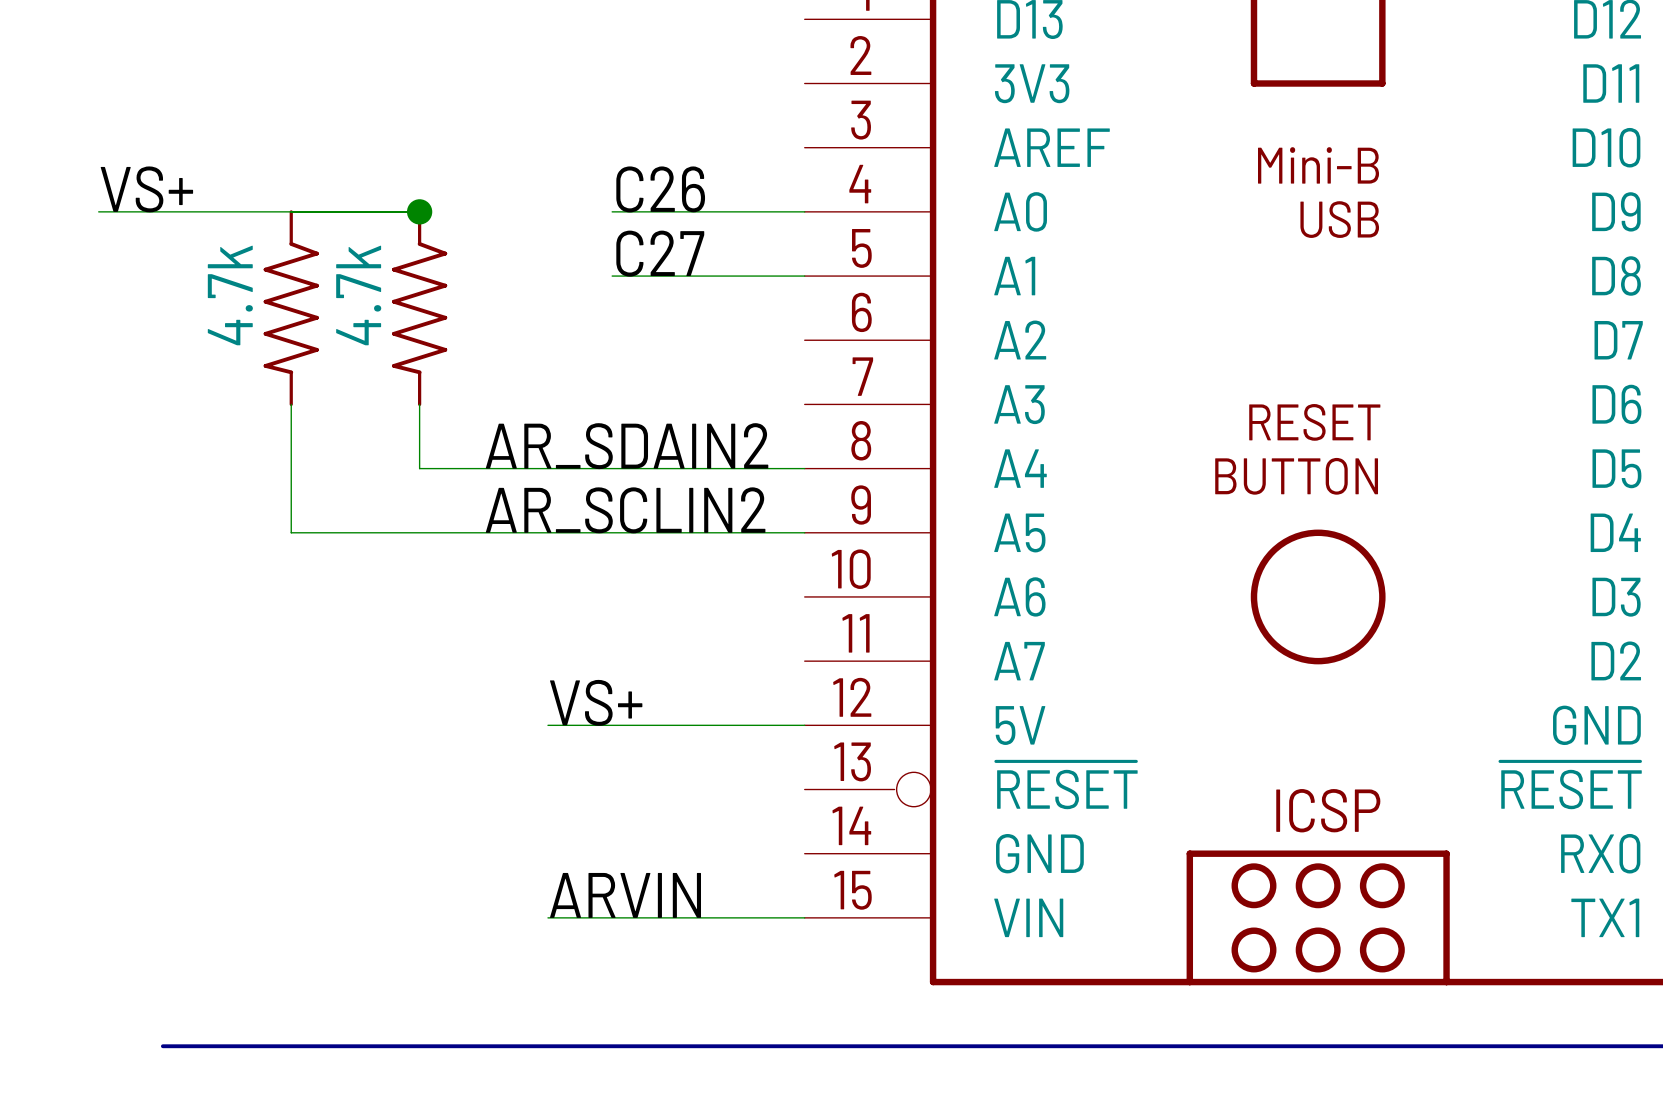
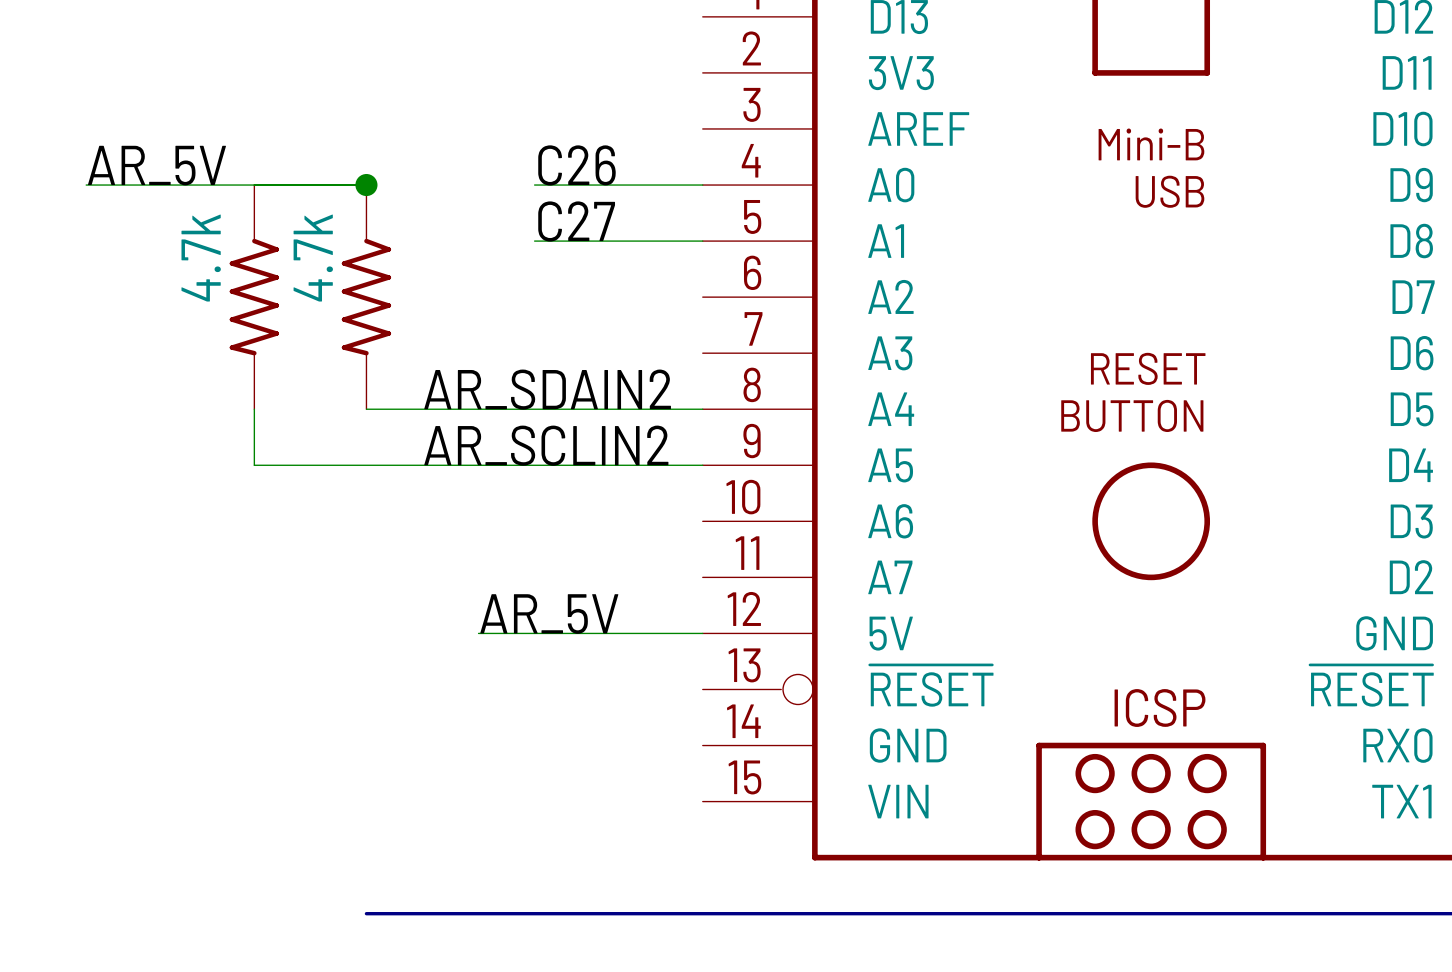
label: VS+ (146, 189) -> AR_5V (156, 165)
part: 4.7k (291, 308) -> none
part: 4.7k (419, 308) -> none
part: none -> 4.7k (254, 297)
part: none -> 4.7k (366, 297)
label: VS+ (596, 702) -> AR_5V (549, 614)
label: ARVIN (625, 895) -> none
wire: (547, 917) (804, 917) -> none
line: (162, 1046) (419, 1046) -> none

